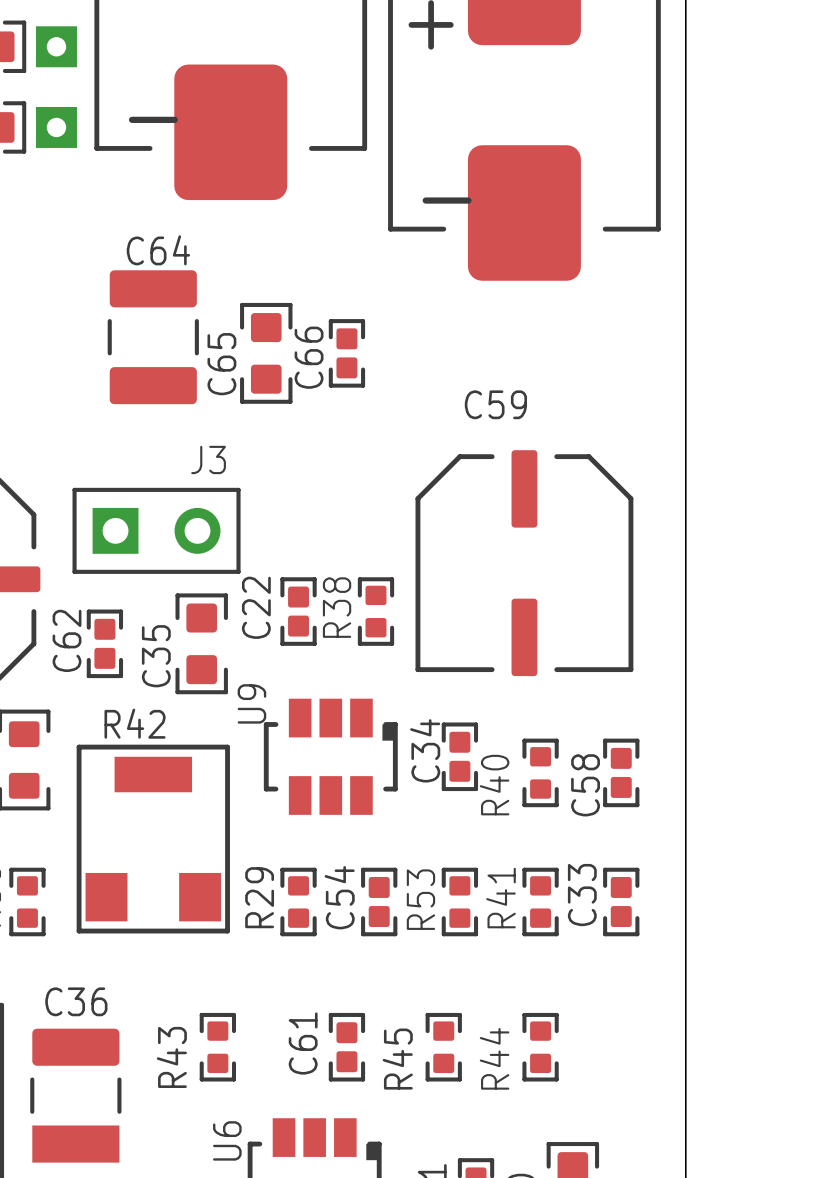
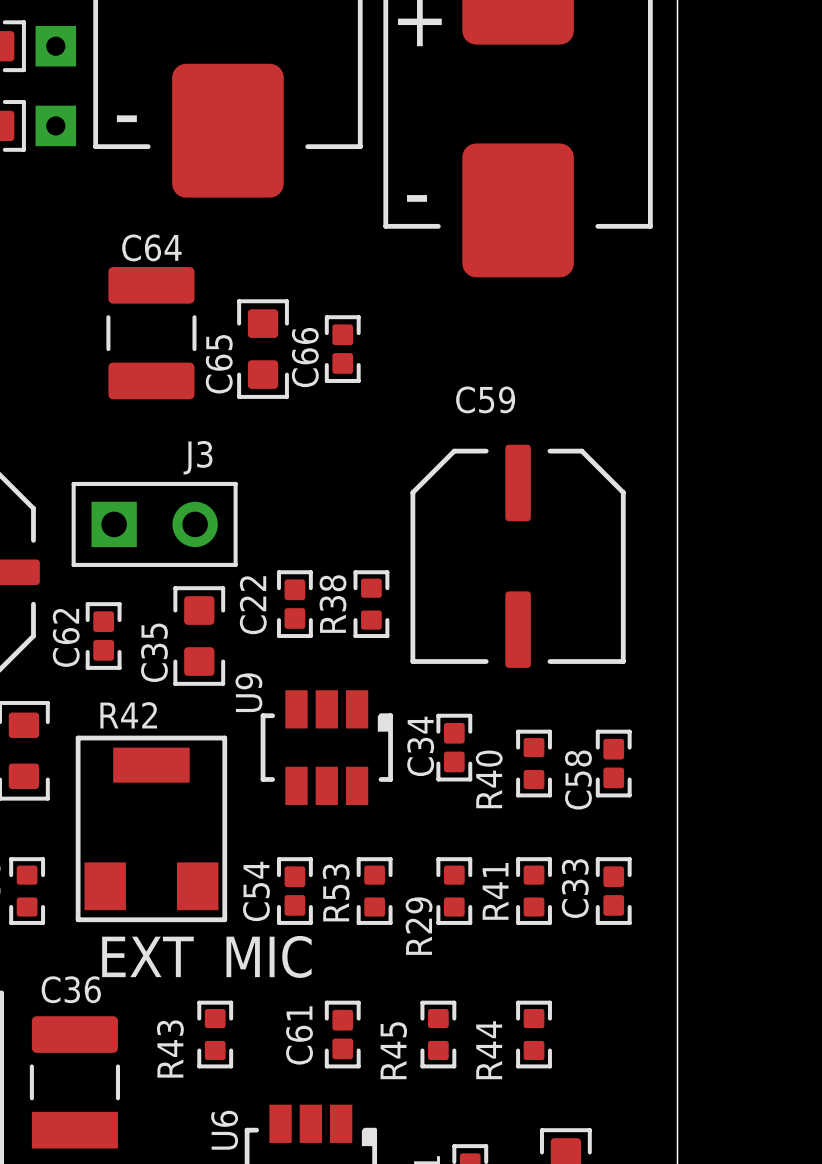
R53 name: R53 (420, 899) -> R29 (419, 926)
R29: (298, 902) -> none
C54 position: (379, 902) -> (294, 891)
R53: none -> (374, 891)
text: none -> EXT (147, 956)
text: none -> MIC (269, 956)

